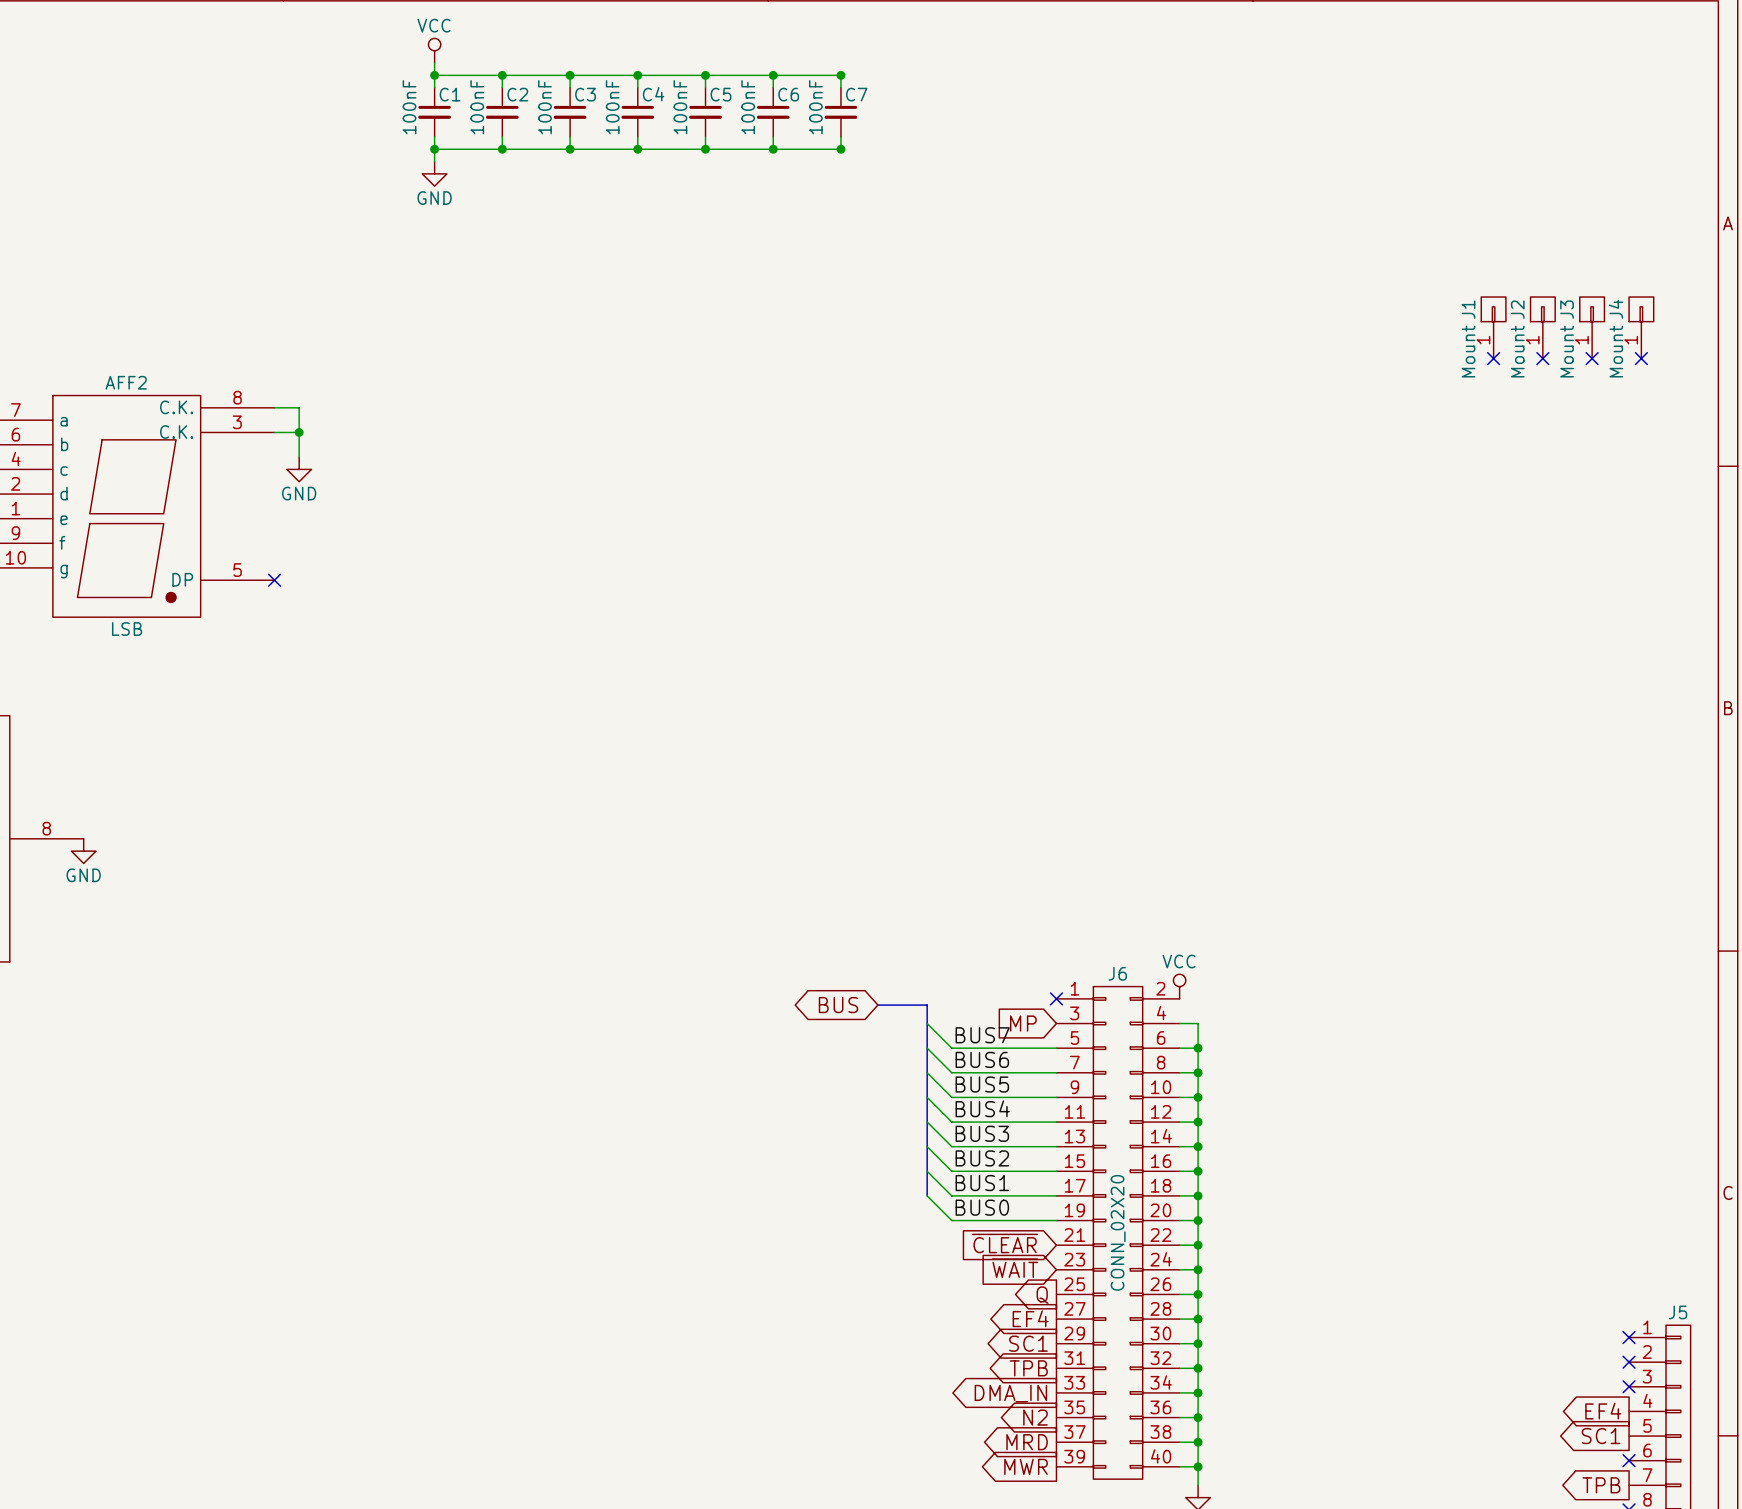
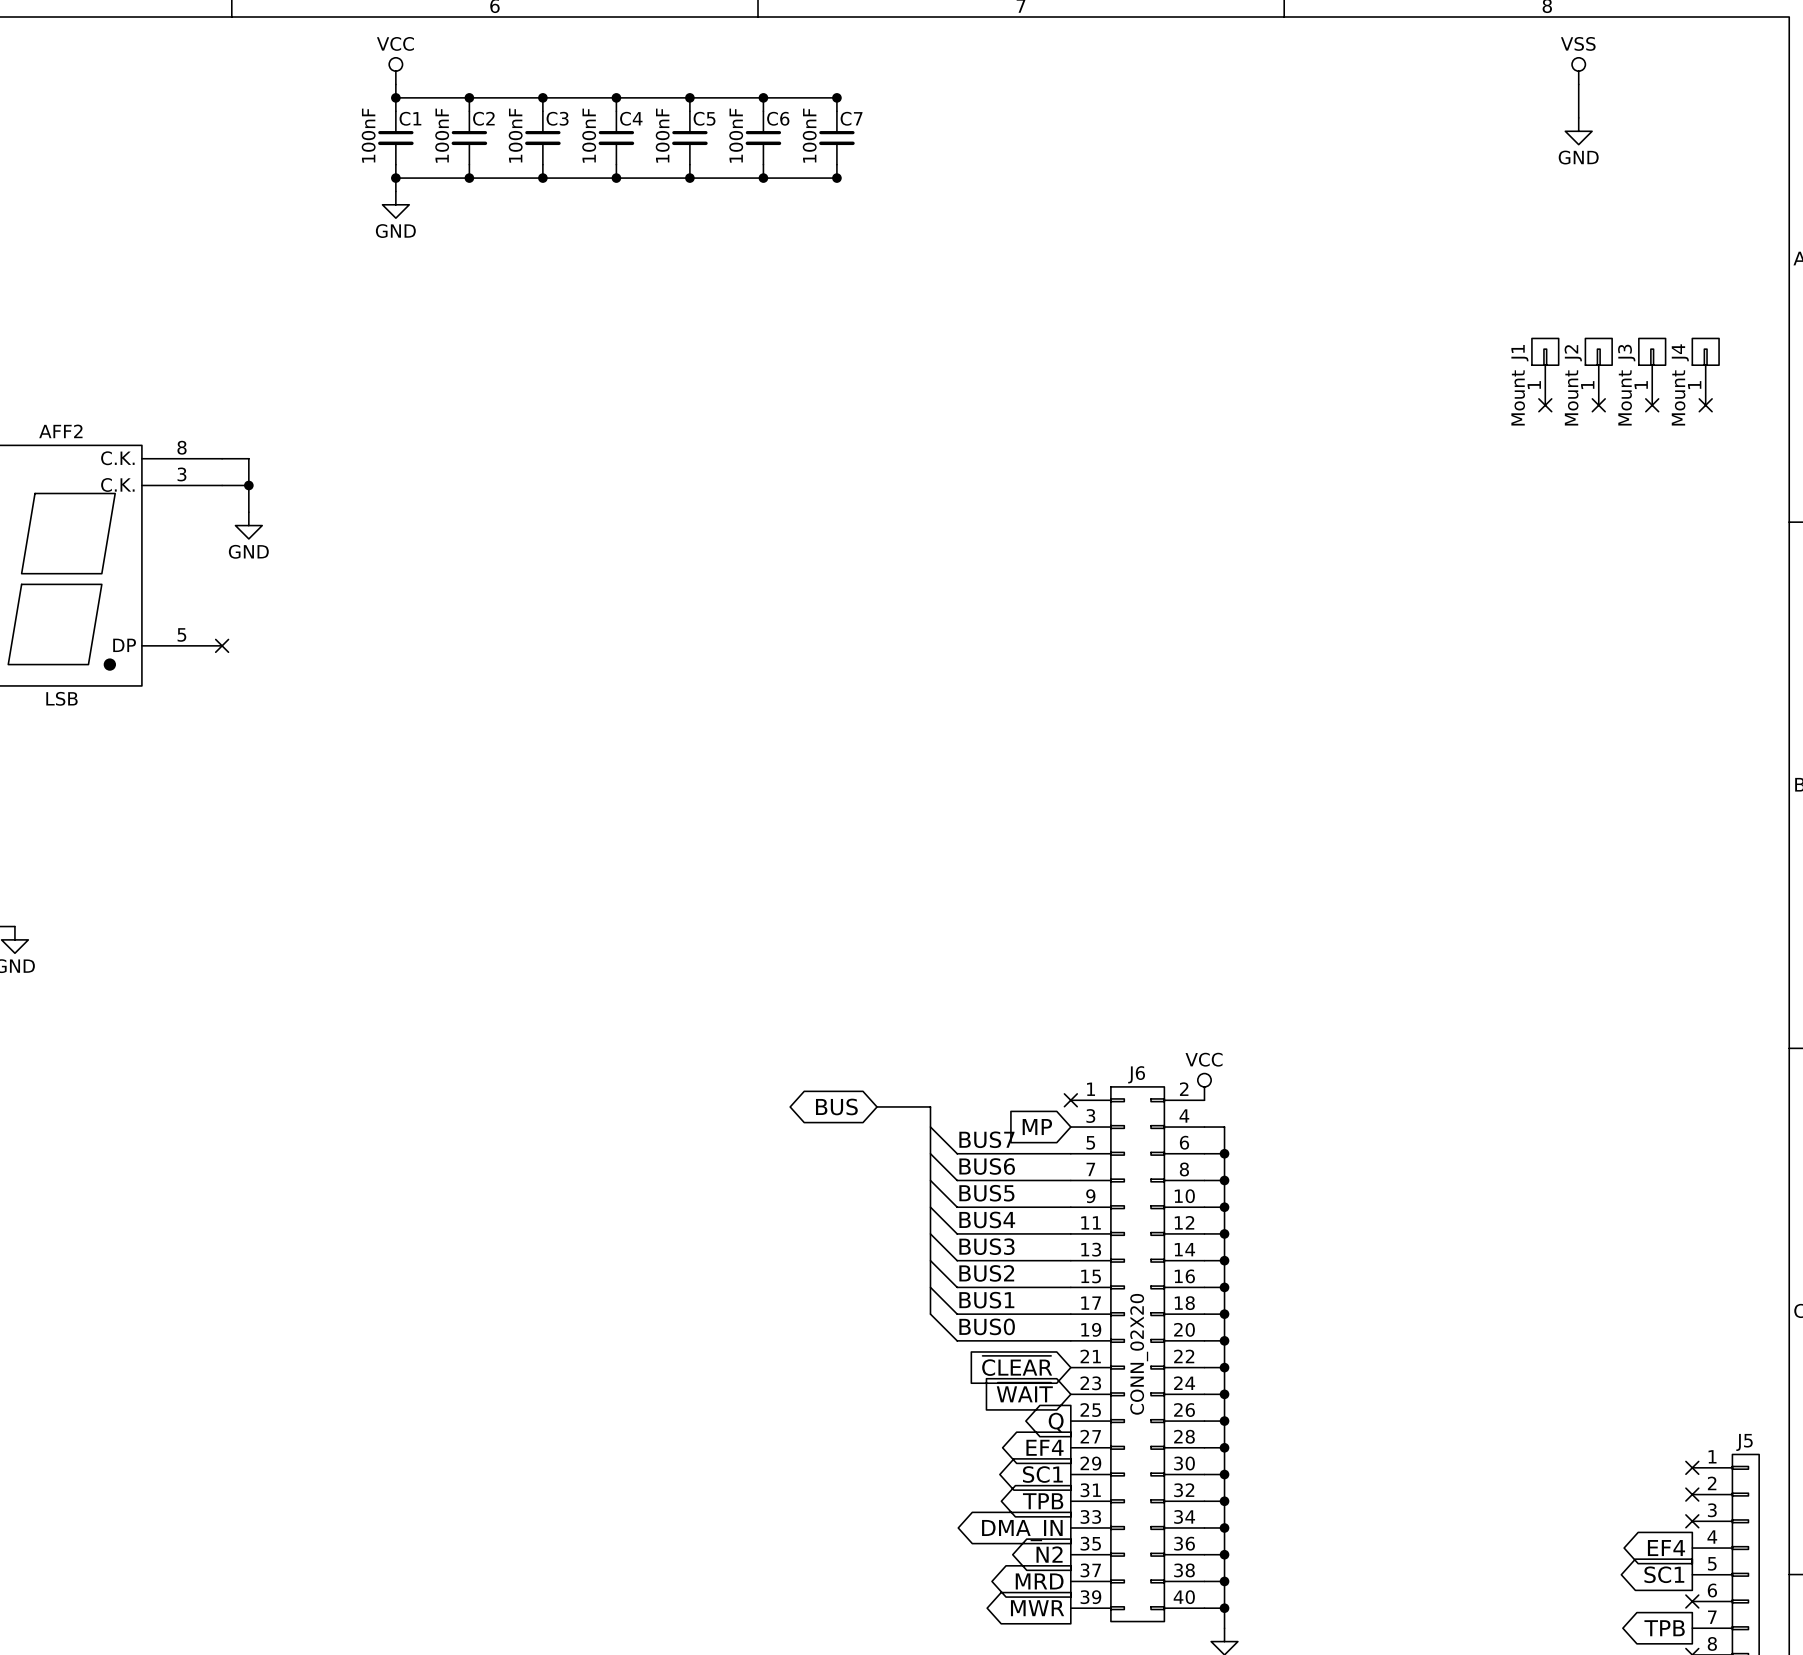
power symbol: none -> VSS (1578, 71)
wire: none -> (1578, 84) (1578, 117)
power symbol: none -> GND (1578, 131)

